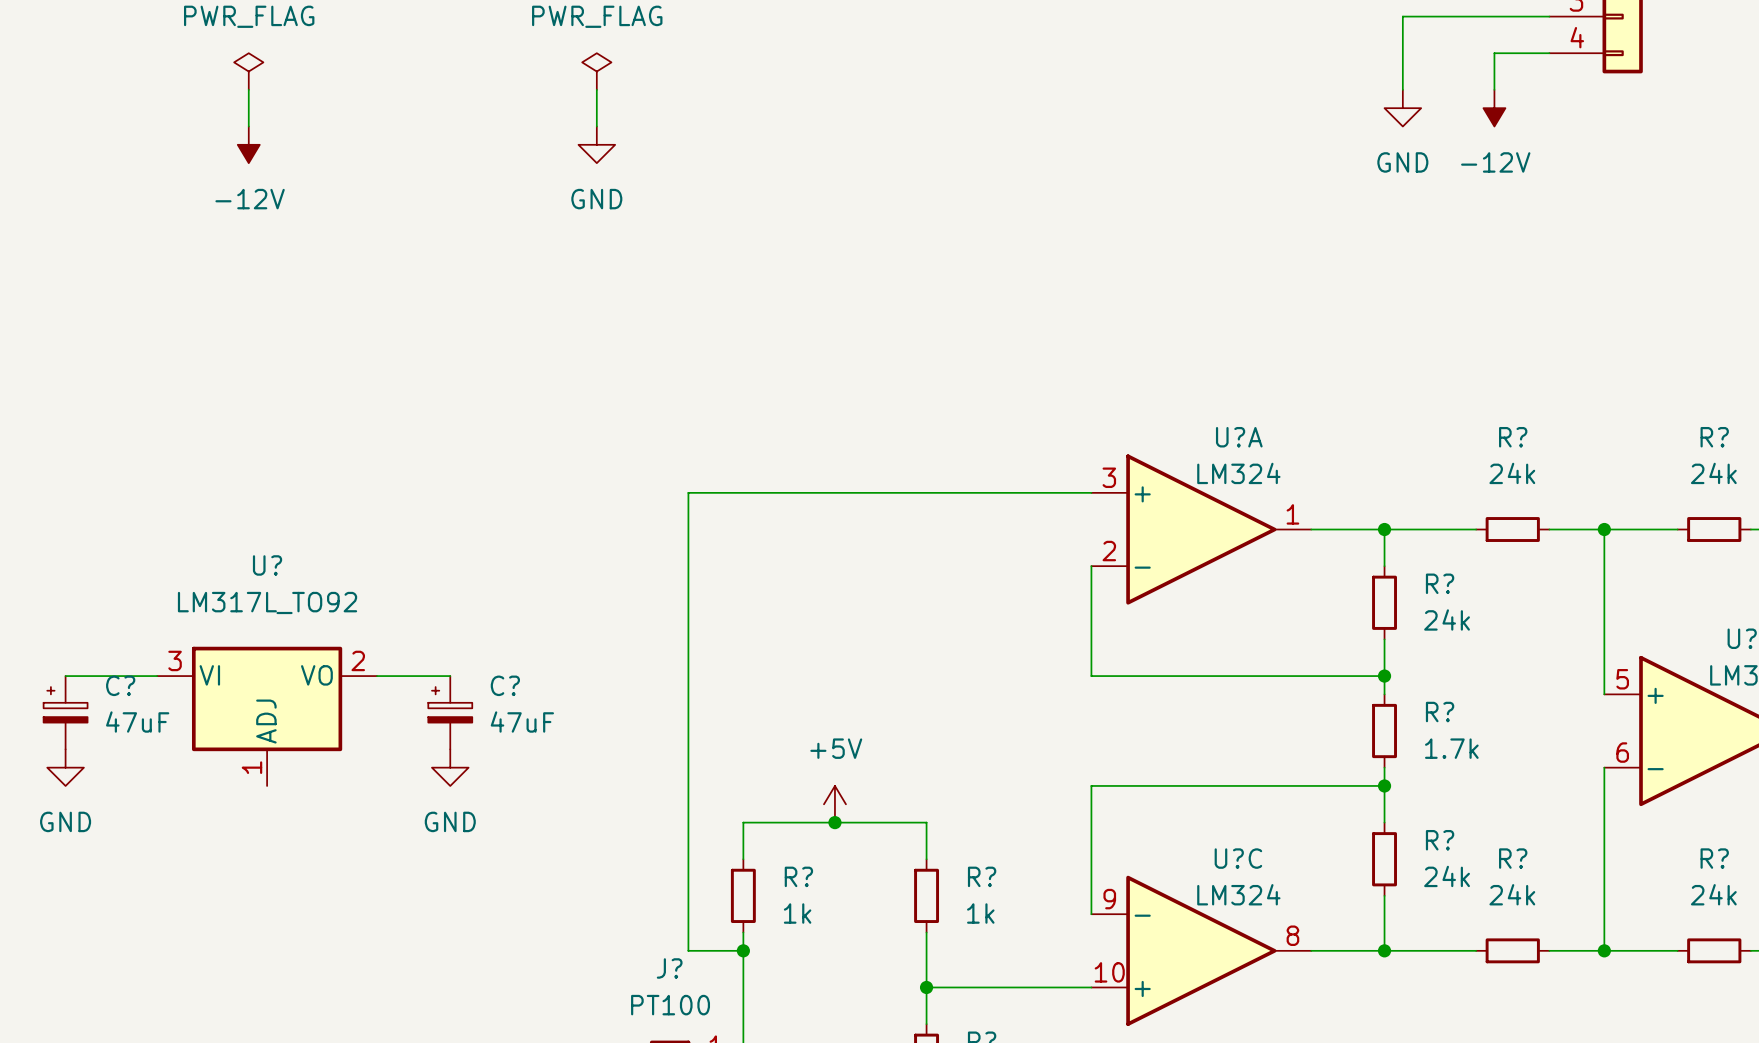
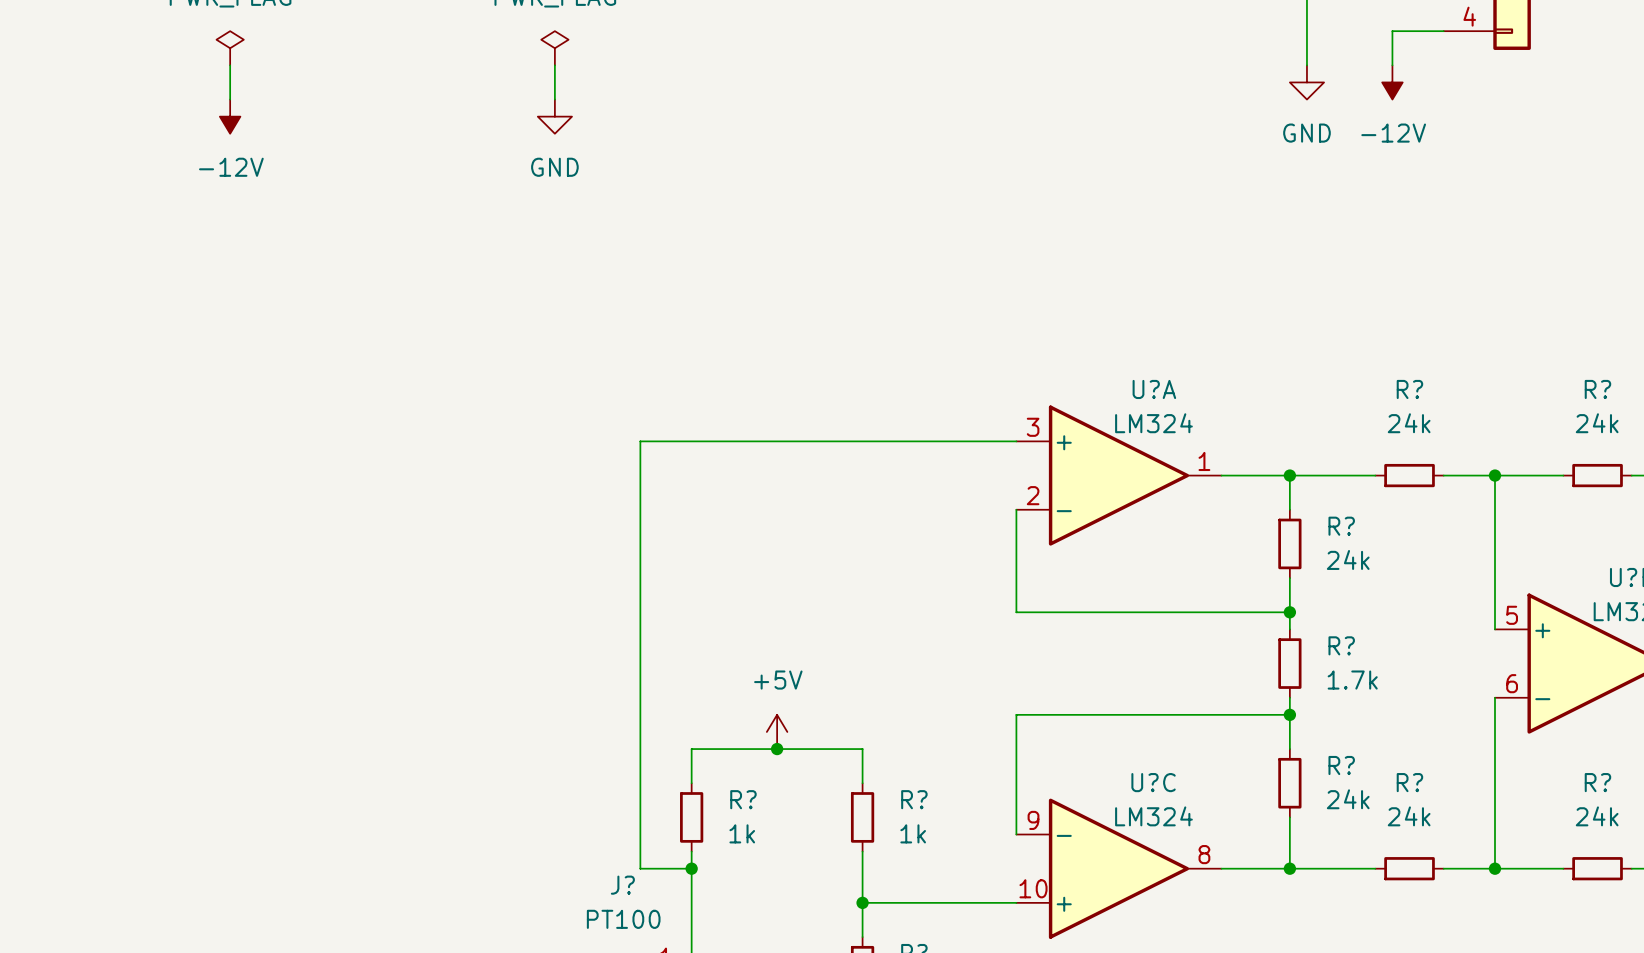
wire: (65, 676) (157, 676) -> none
wire: (377, 676) (450, 676) -> none
C?: 47uF (65, 712) -> none
C?: 47uF (450, 712) -> none
U?: LM317L_TO92 (267, 716) -> none
power symbol: GND (65, 767) -> none
power symbol: GND (450, 767) -> none

